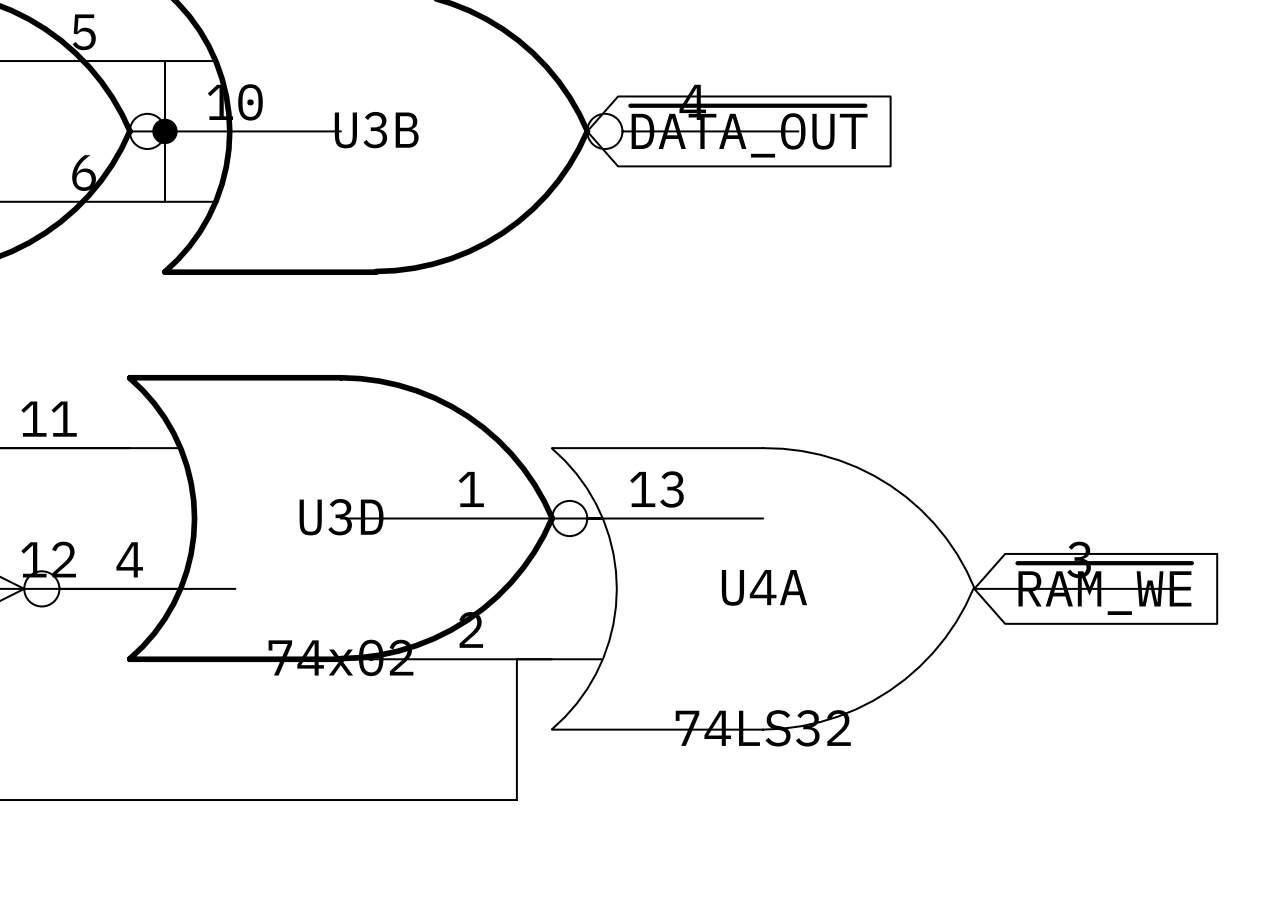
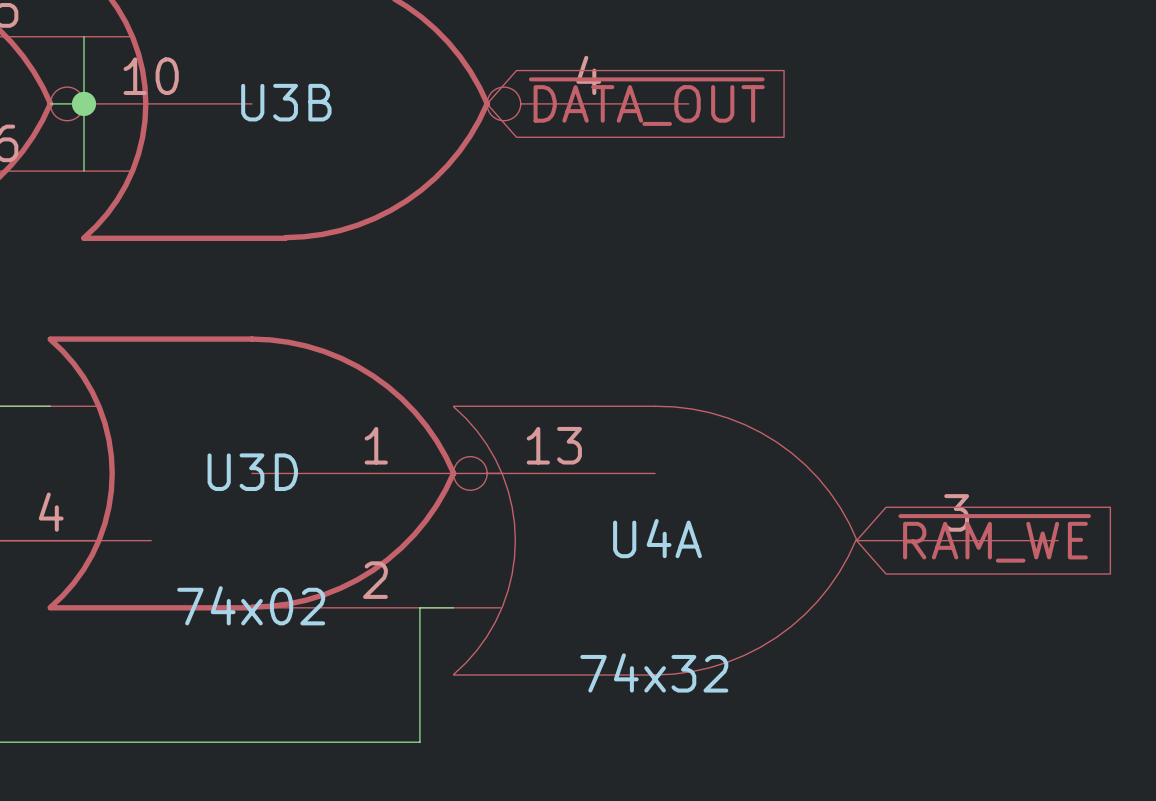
U4A value: 74LS32 (763, 728) -> 74x32 (654, 672)

